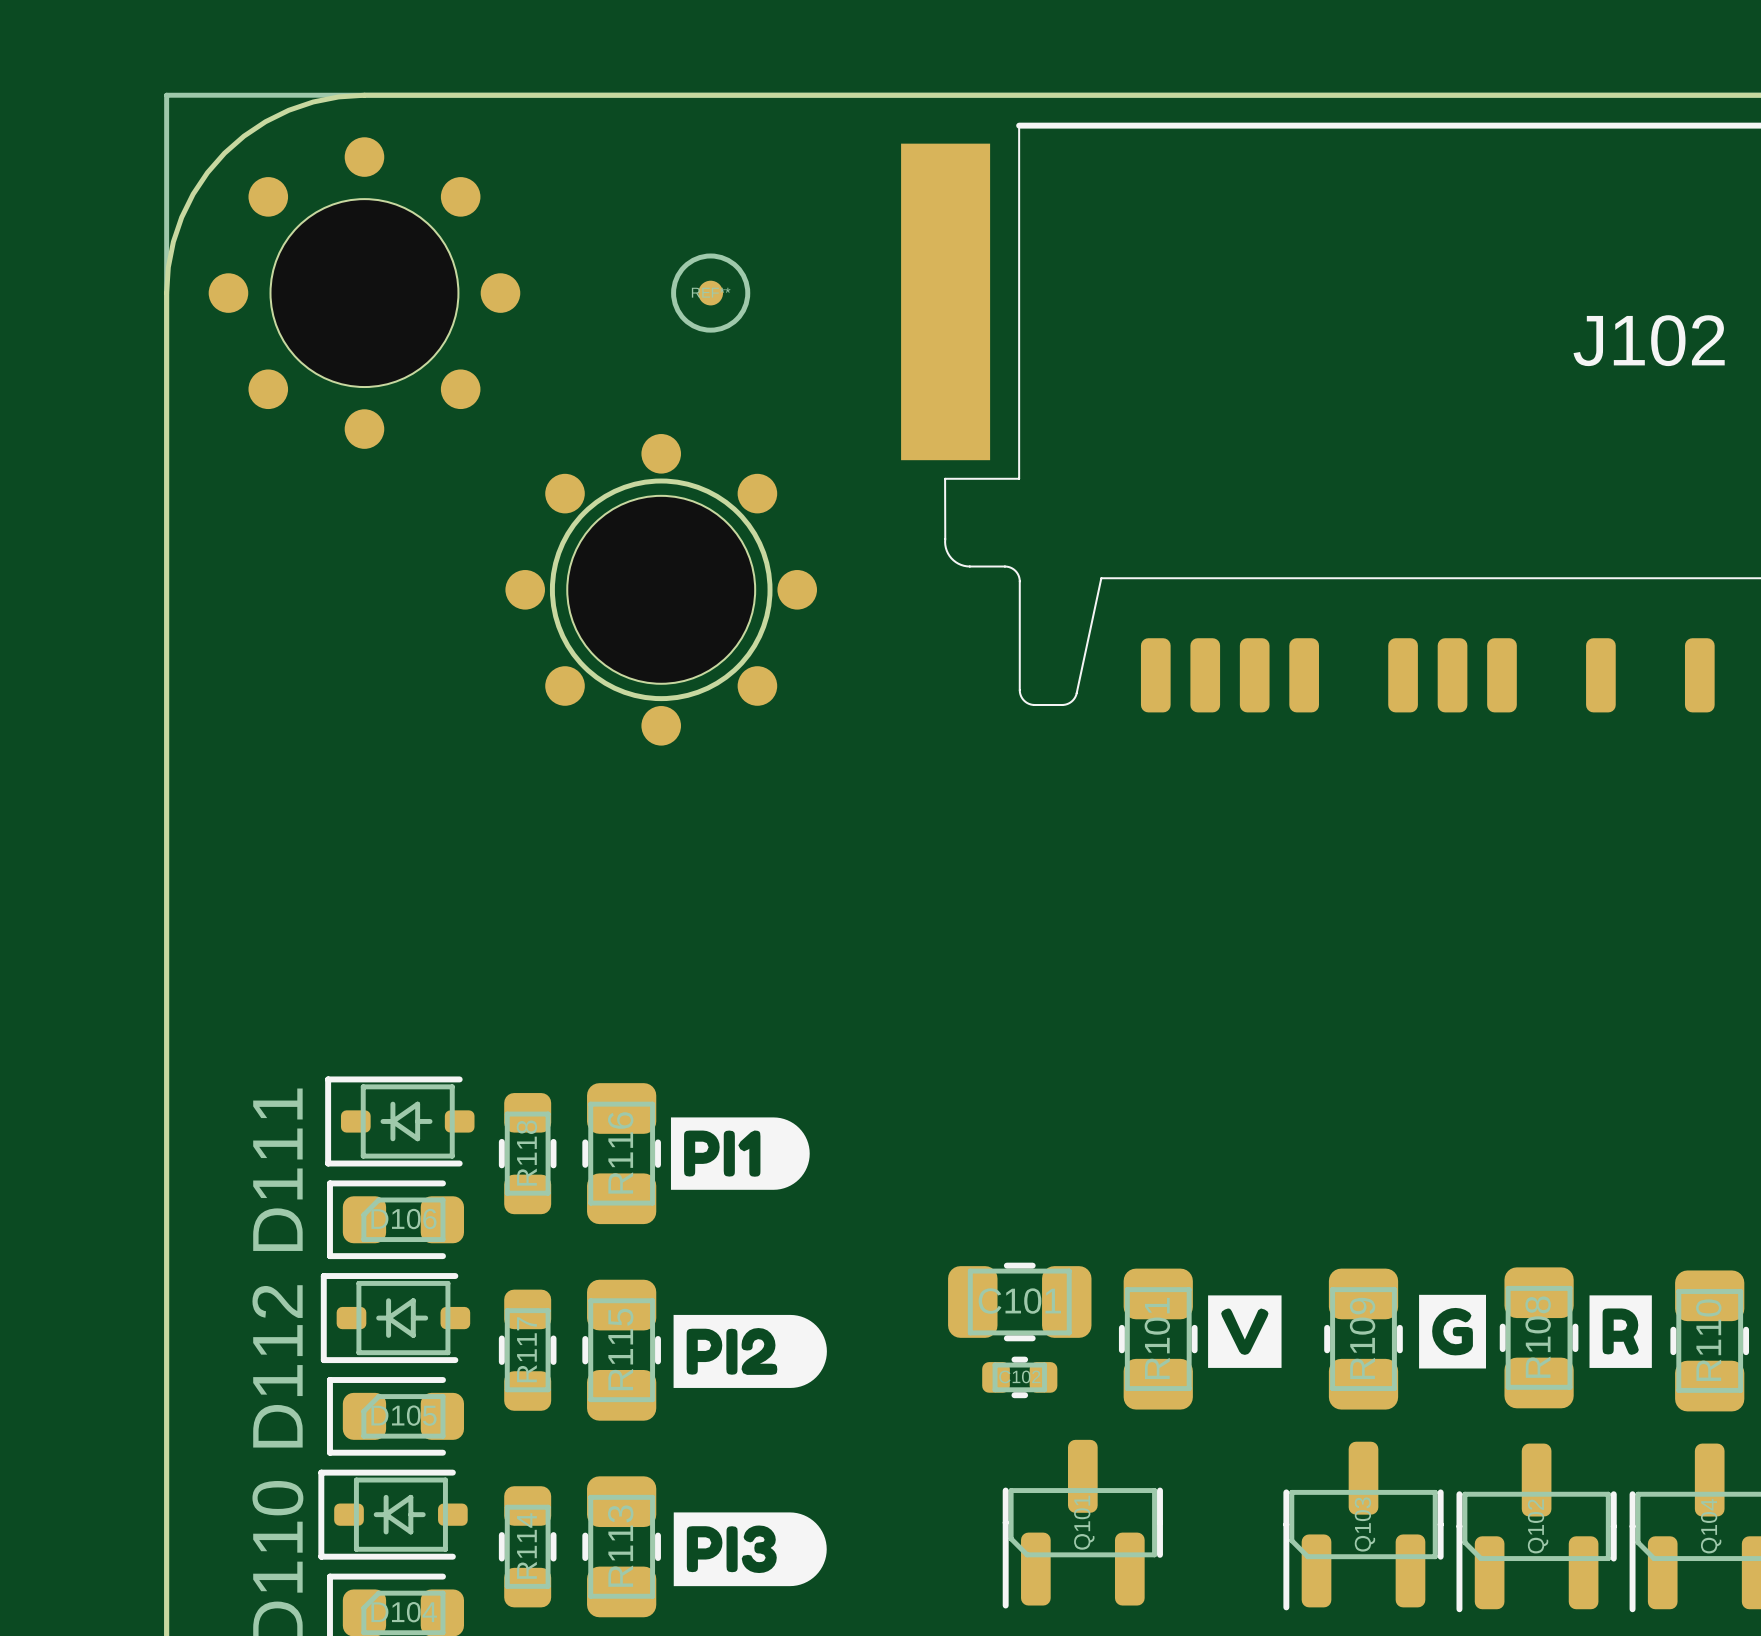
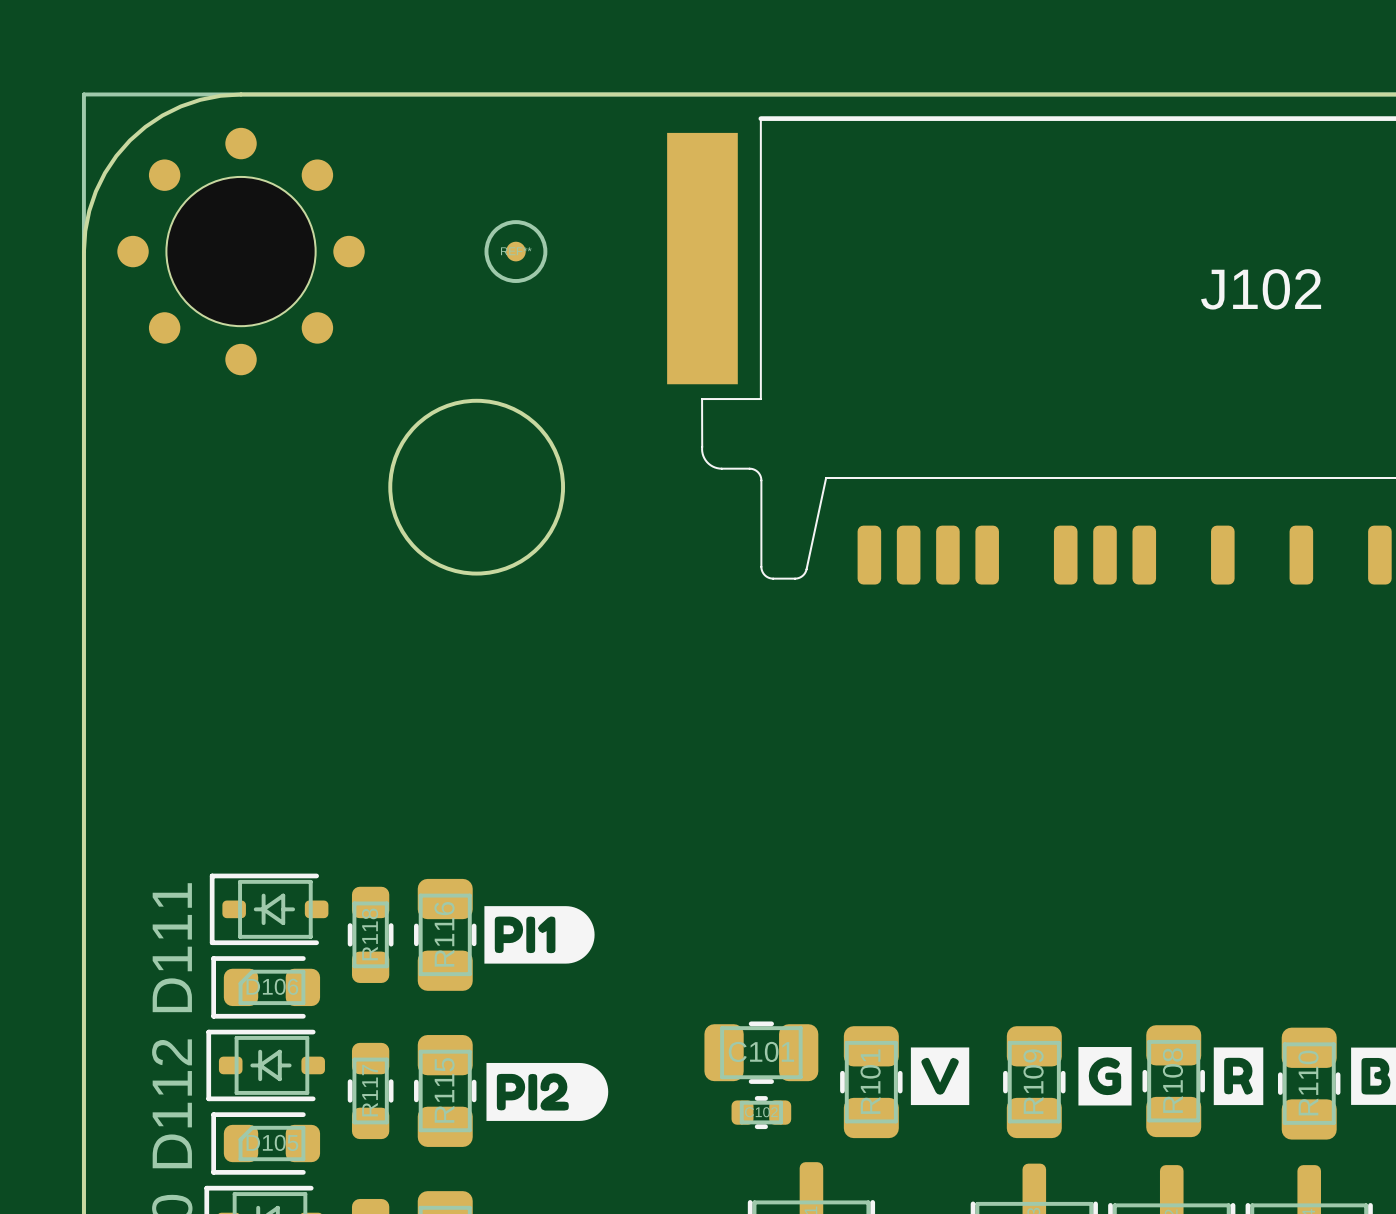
part: (661, 589) -> none

